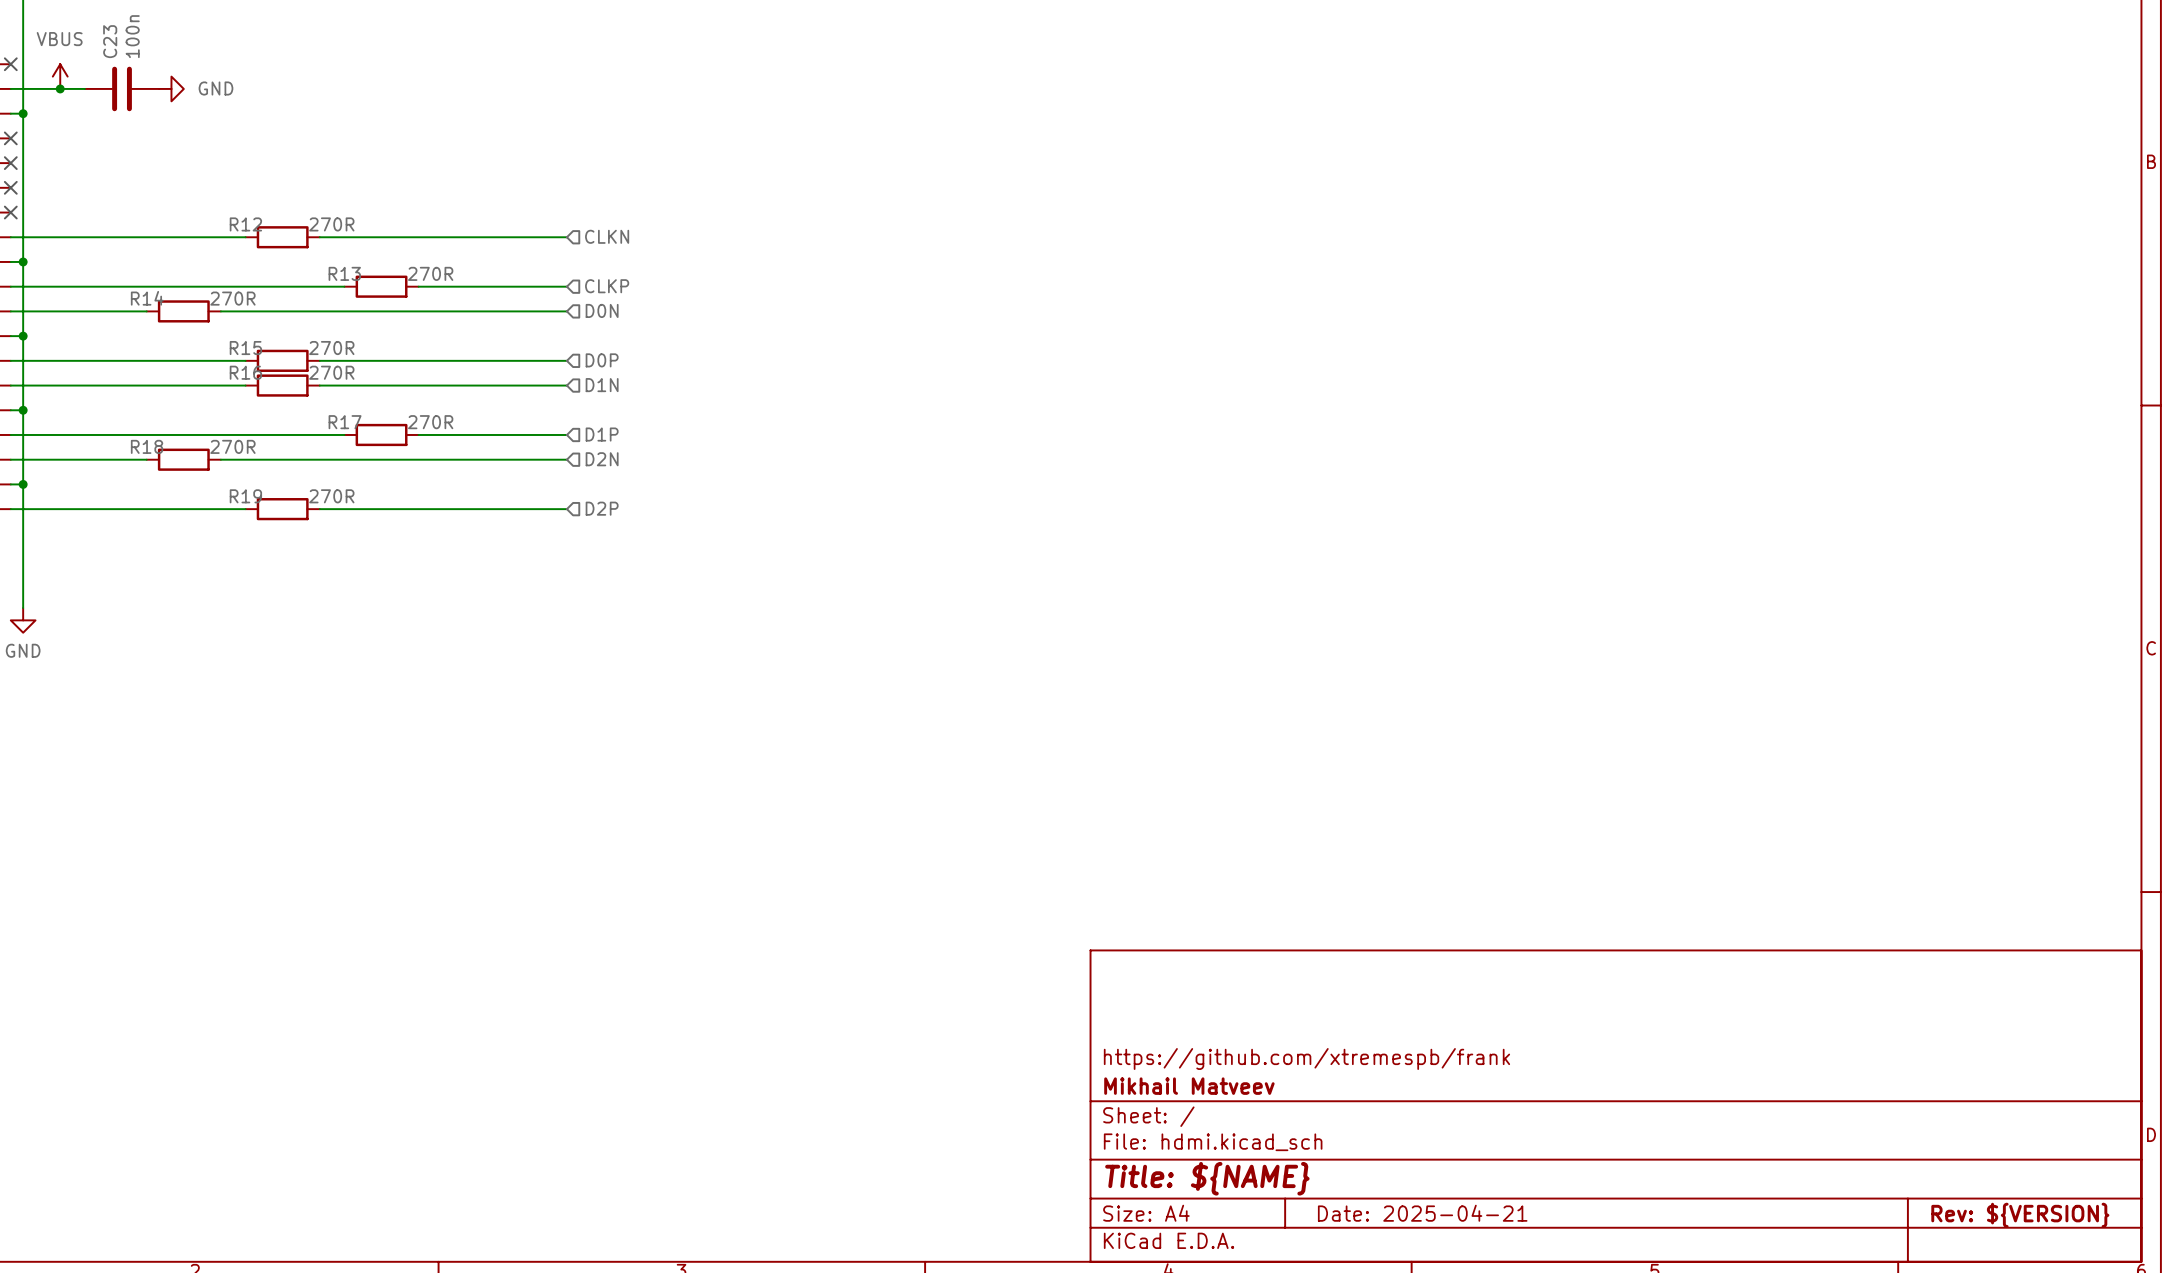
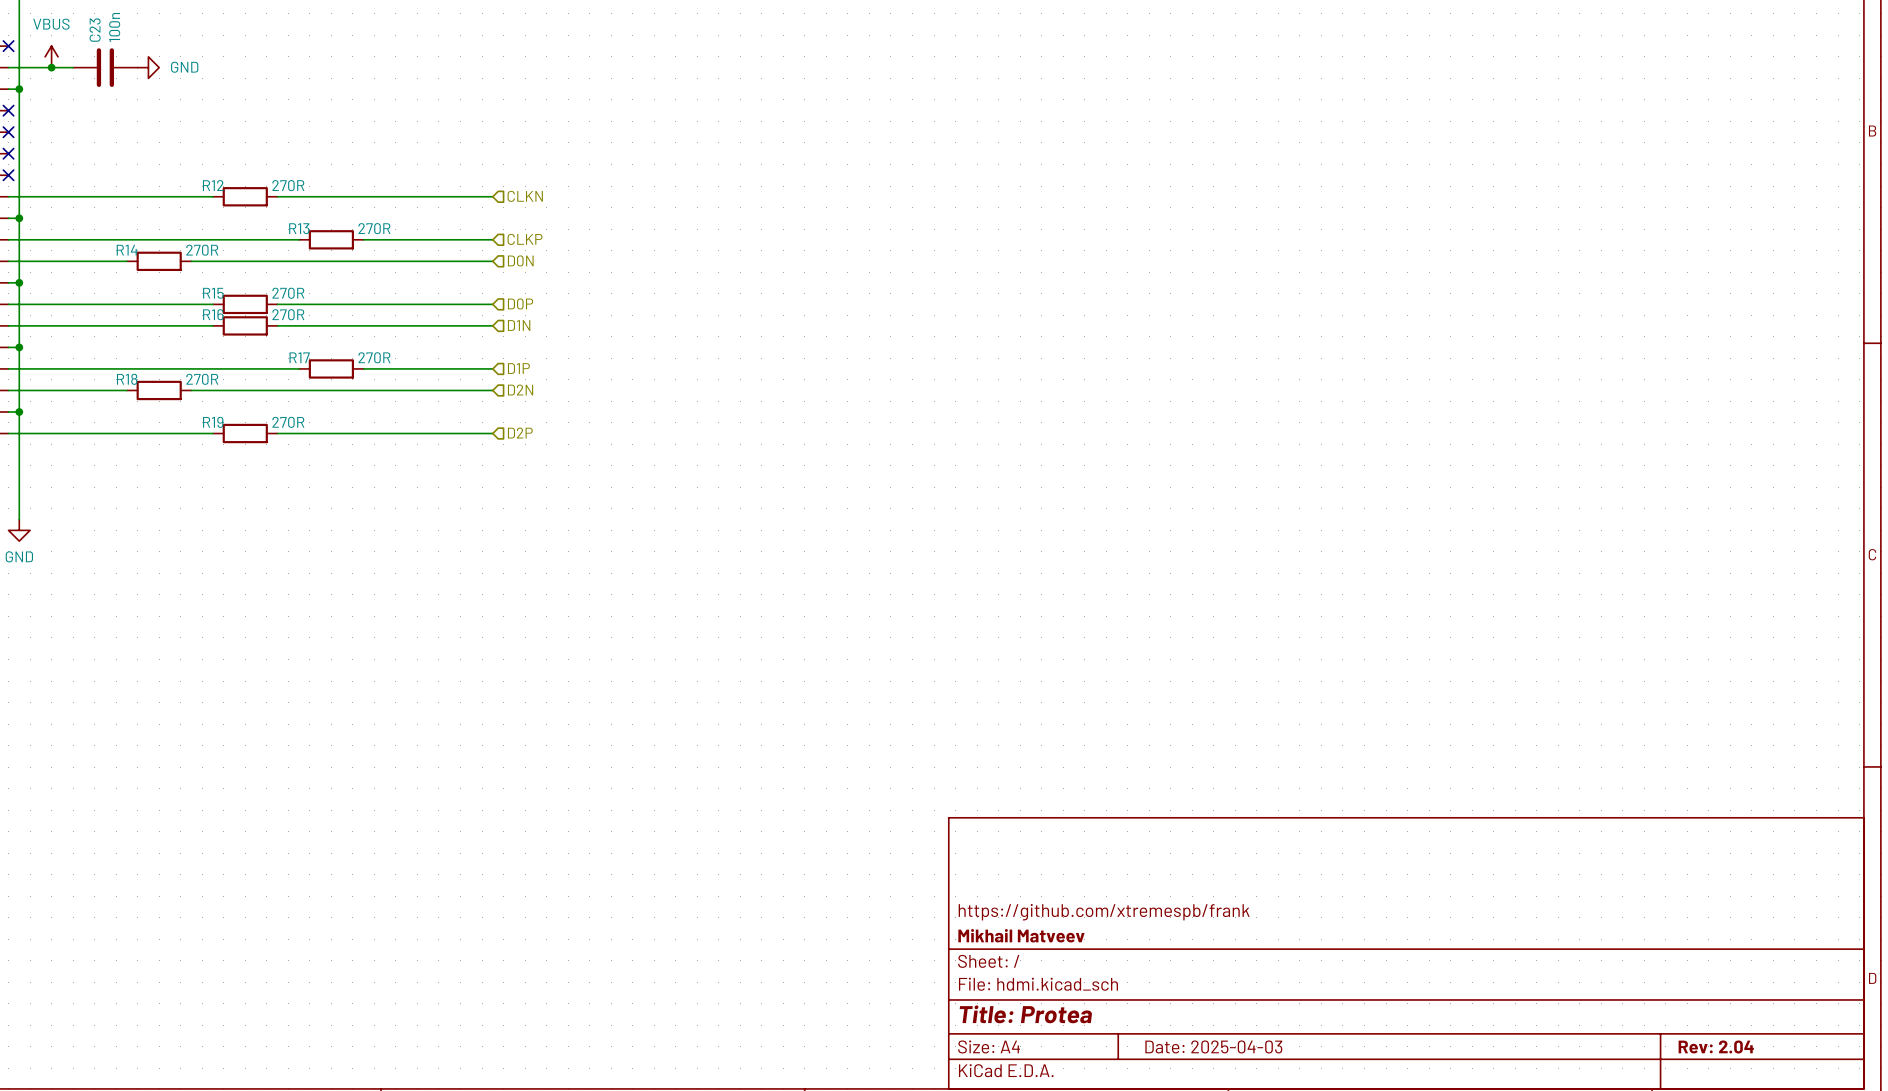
title block: Title: ${NAME} (1207, 1178) -> Title: Protea (1025, 1014)
title block: Date: 2025-04-21 (1422, 1213) -> Date: 2025-04-03 (1213, 1046)
title block: Rev: ${VERSION} (2020, 1215) -> Rev: 2.04 (1716, 1046)

